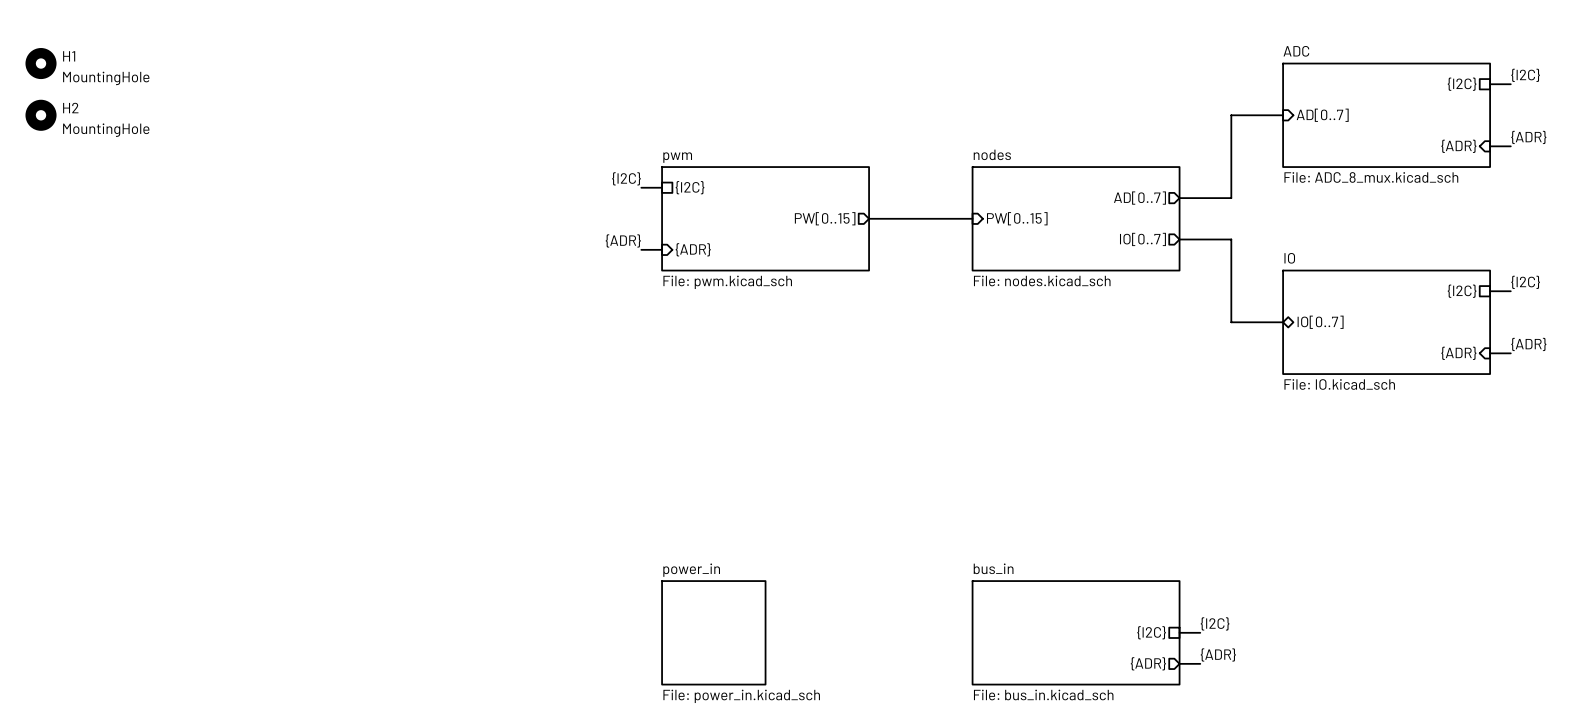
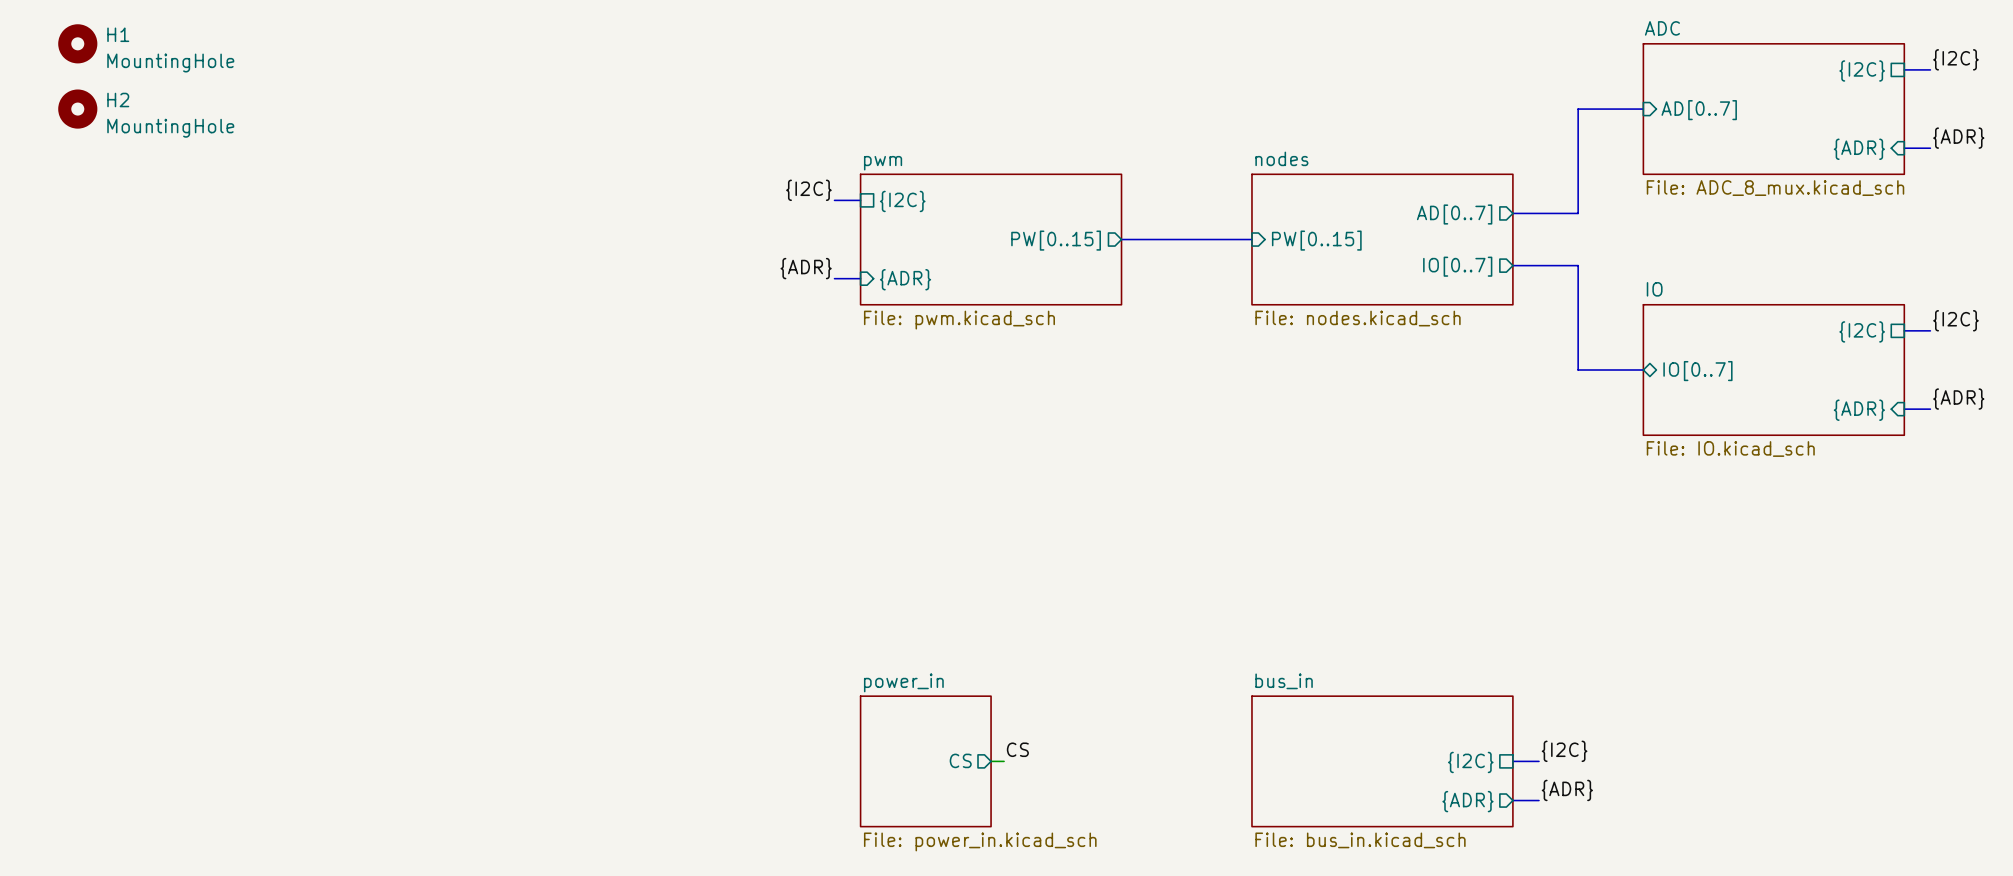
label: none -> CS (1017, 749)
sheet pin: none -> CS (960, 760)
wire: none -> (991, 761) (1004, 761)

